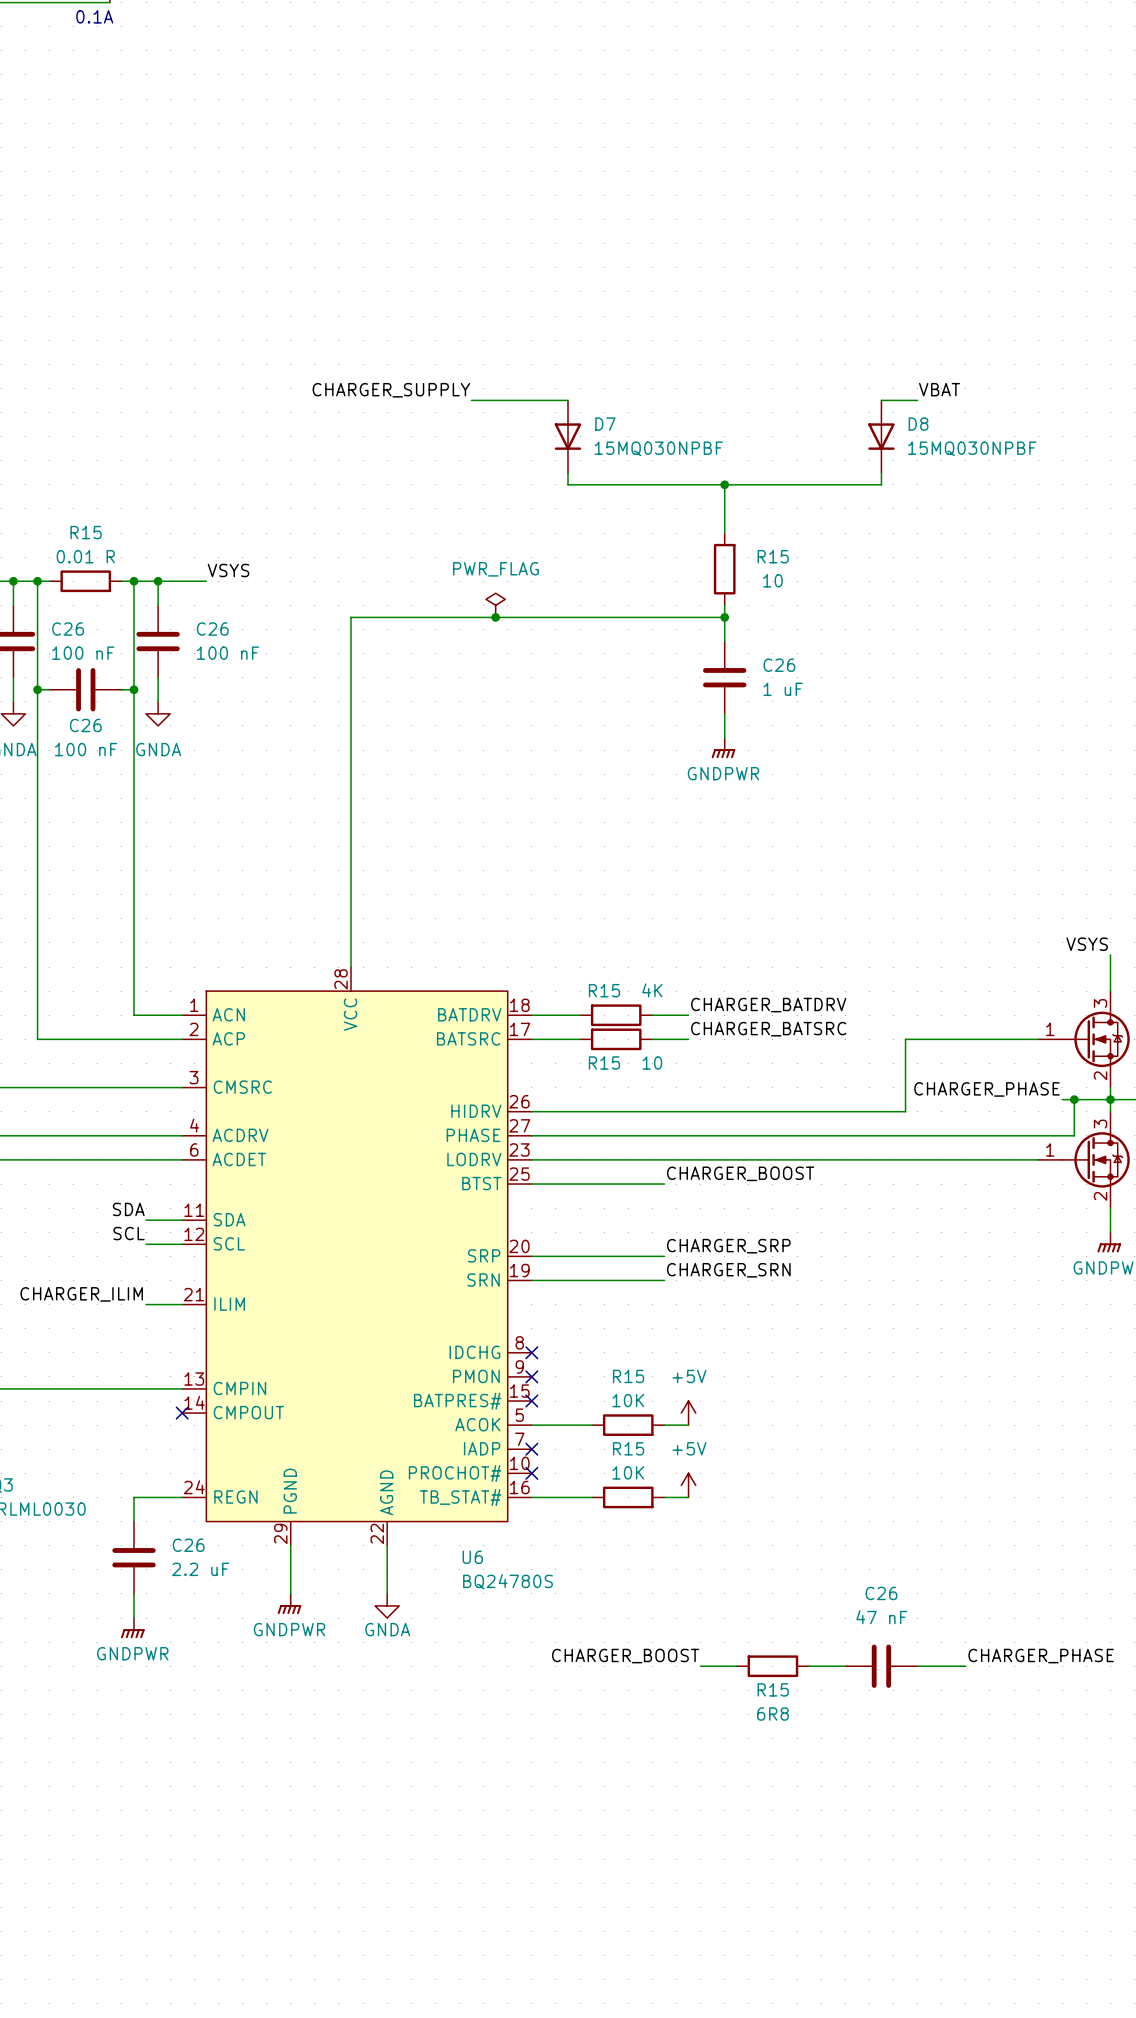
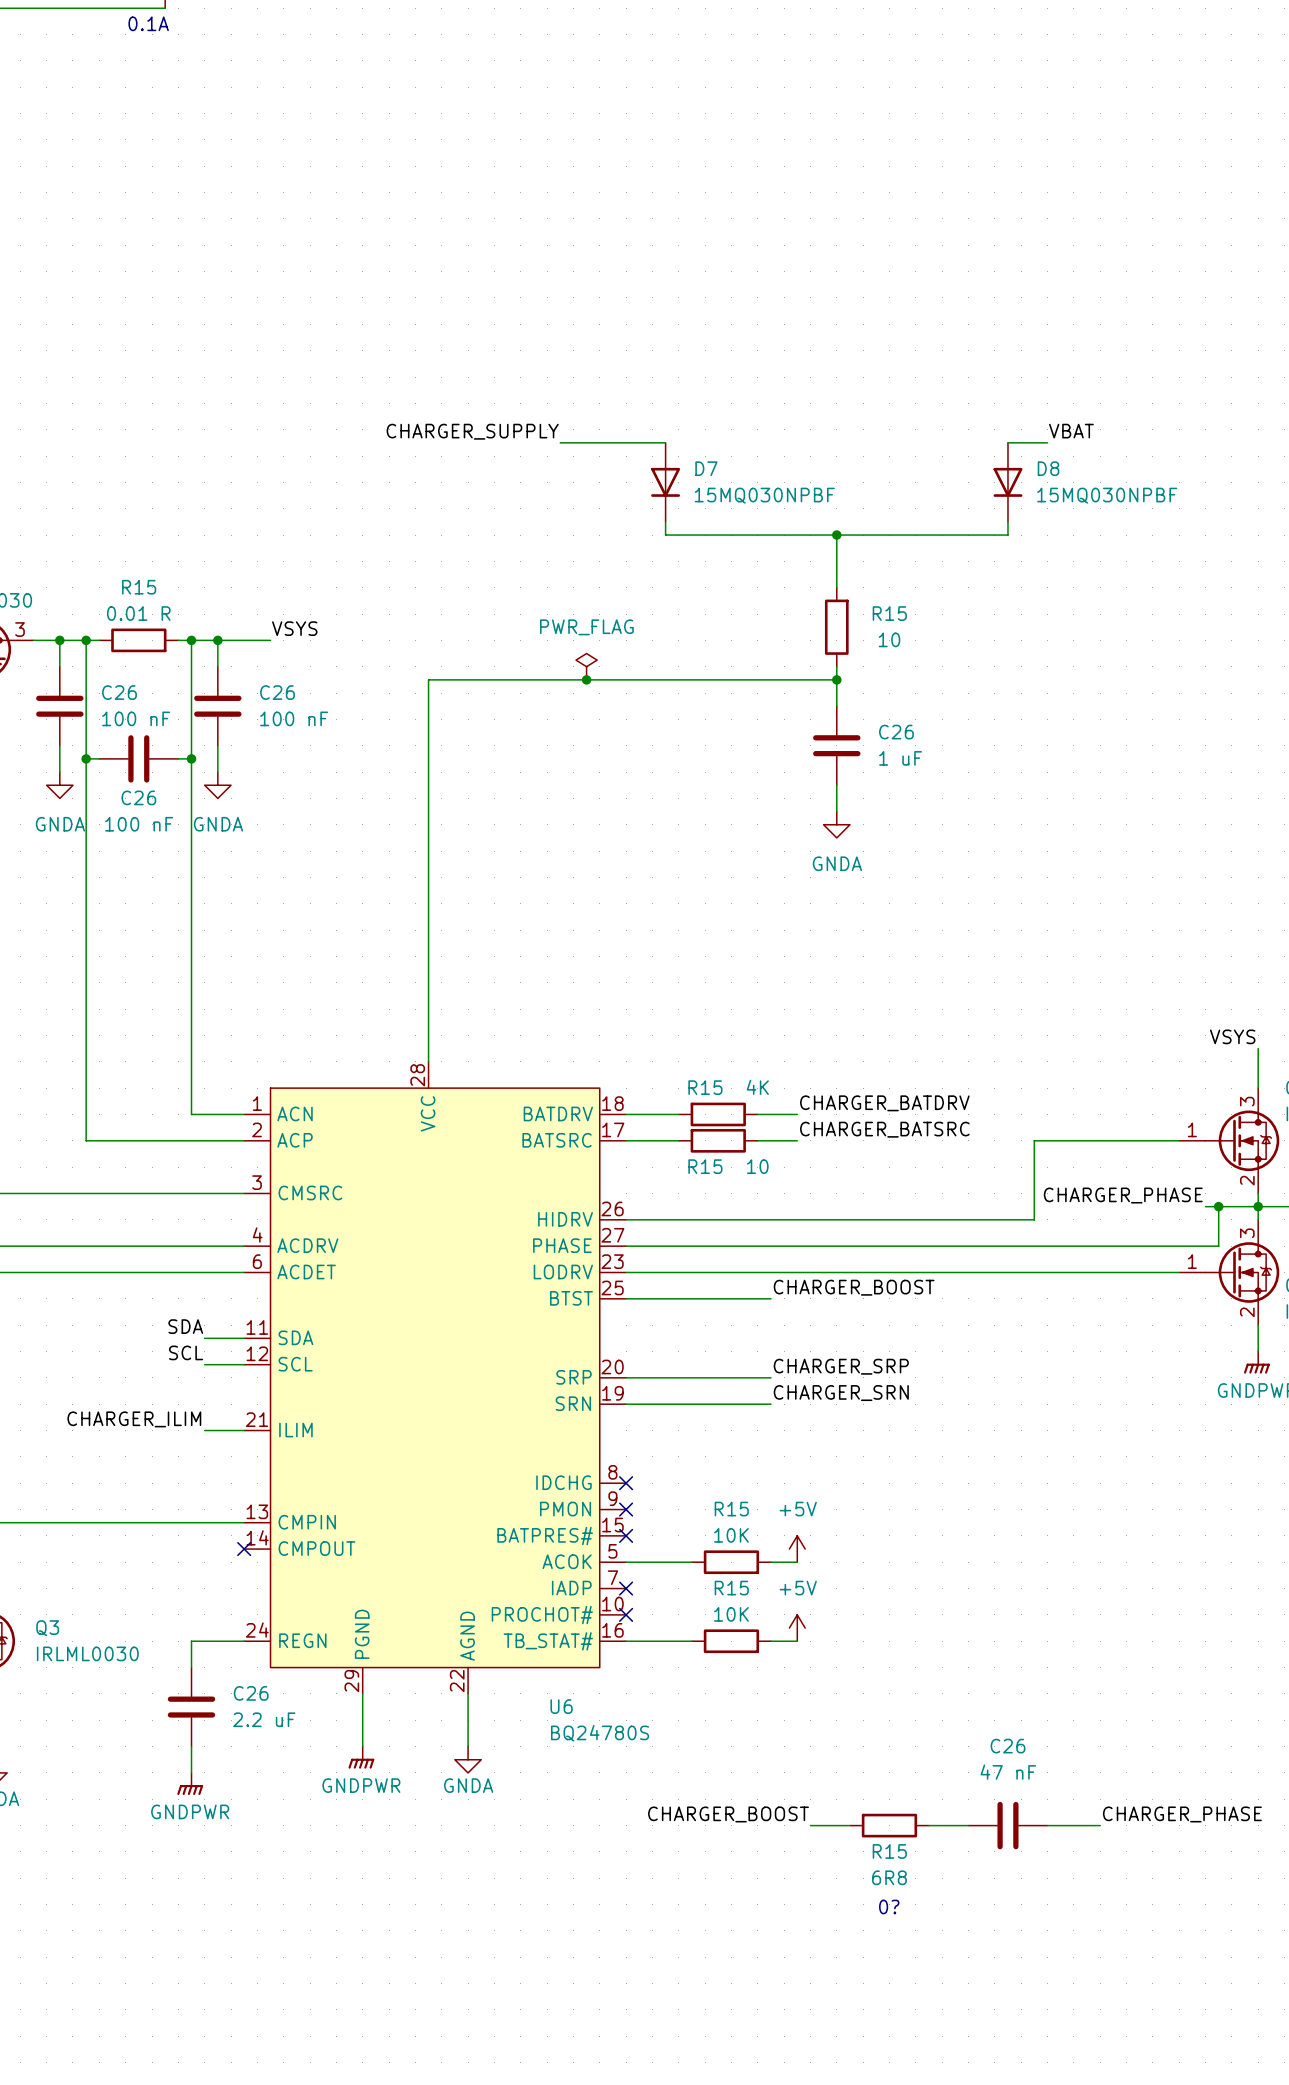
power symbol: GNDPWR (723, 748) -> GNDA (836, 824)
text: none -> 0? (889, 1906)

